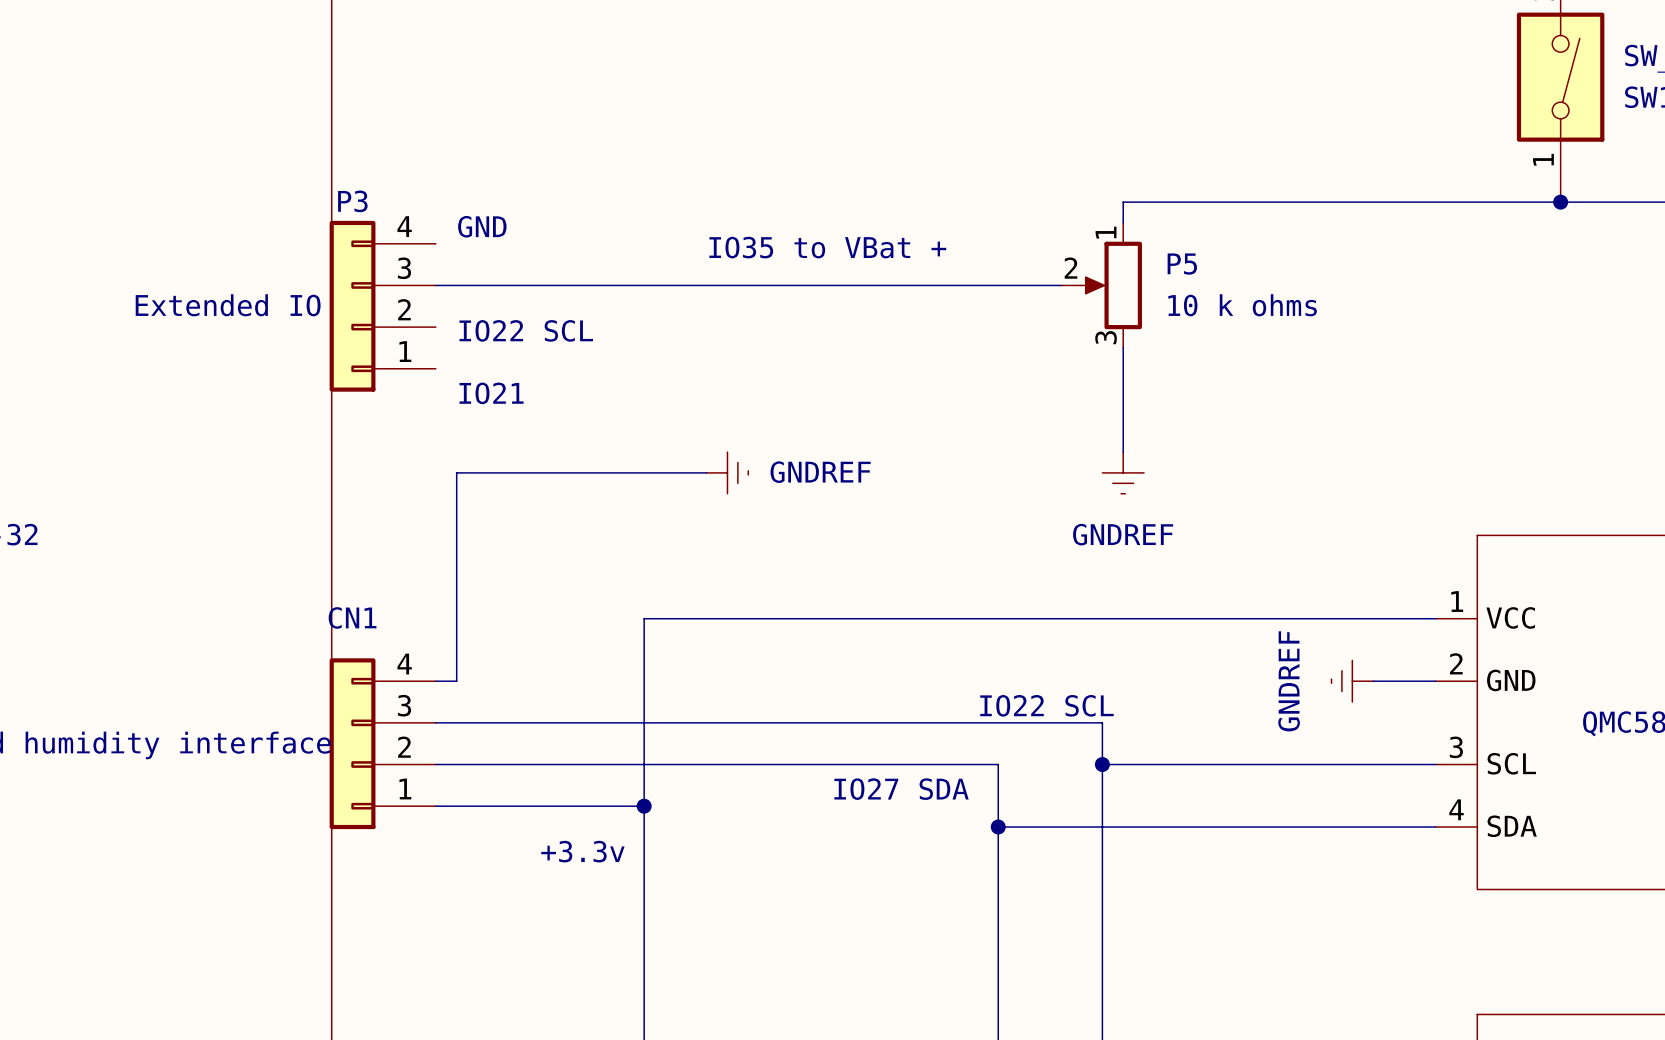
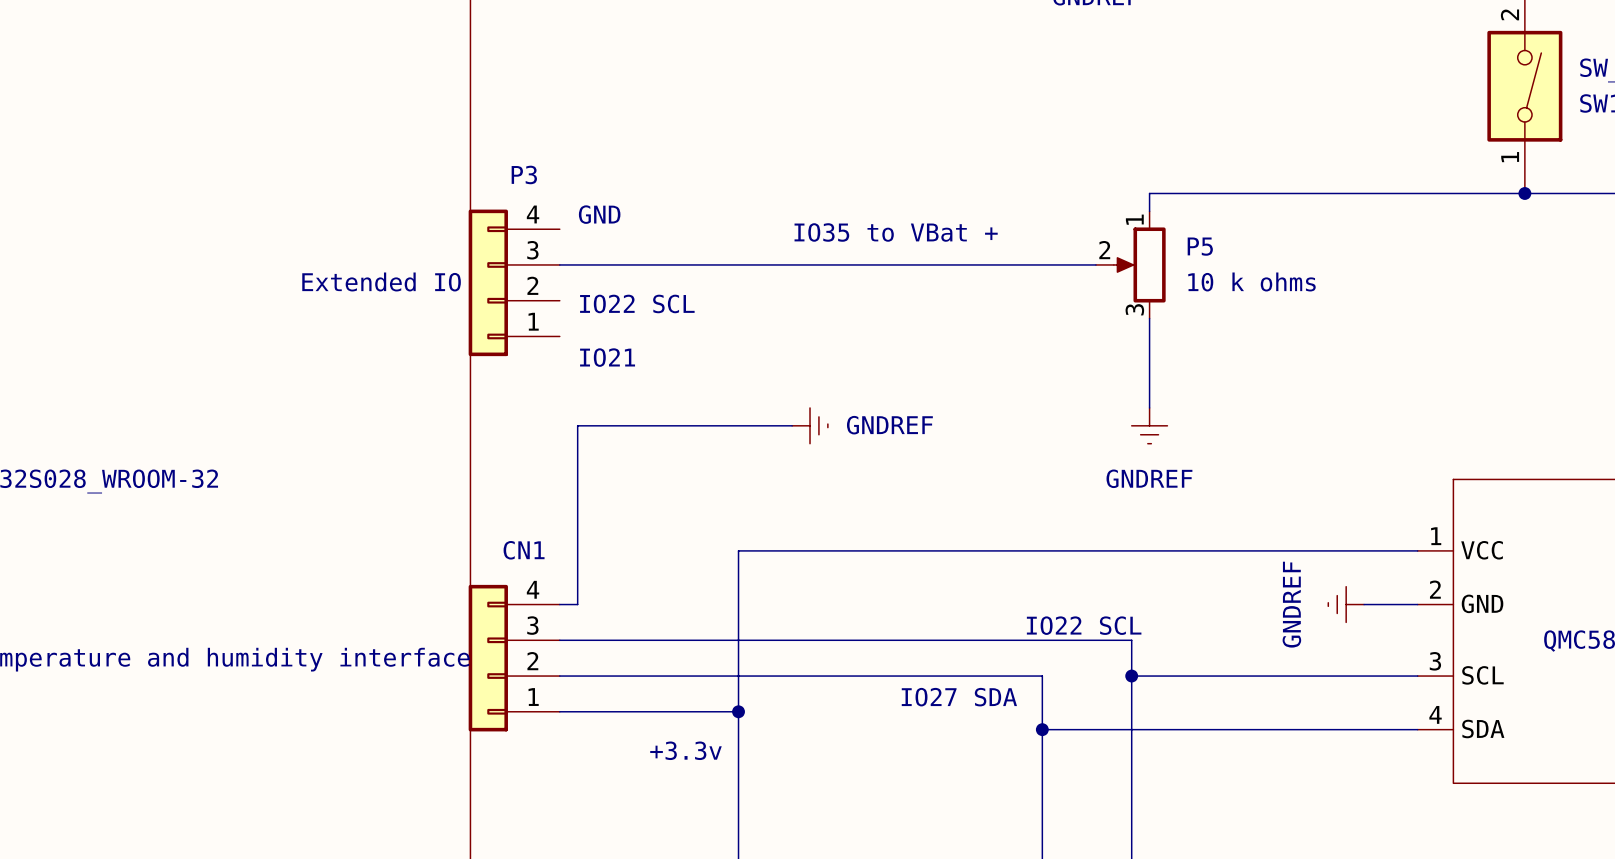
P3 name position: P3 (352, 201) -> P3 (524, 174)
CN1 name position: CN1 (352, 617) -> CN1 (524, 550)

